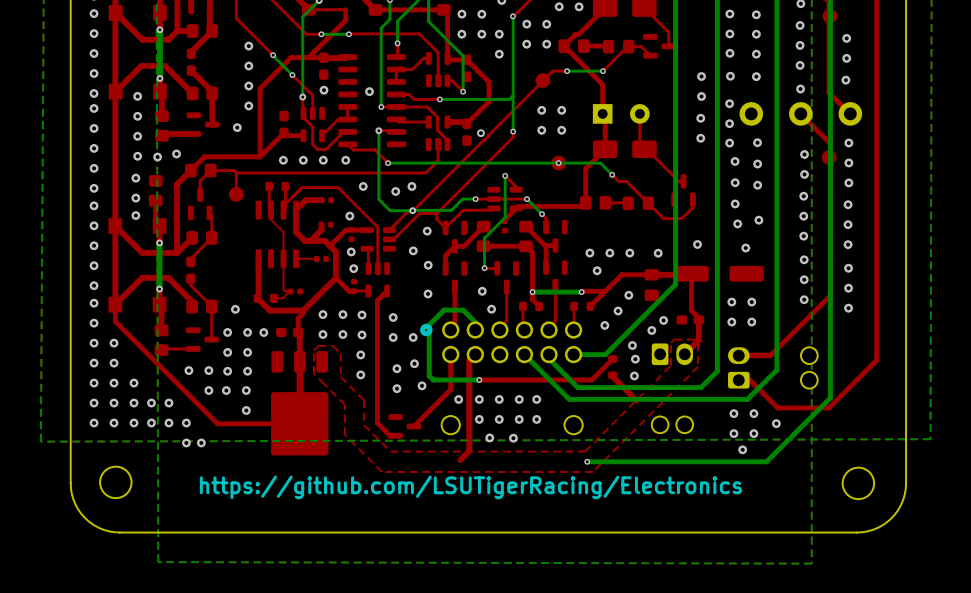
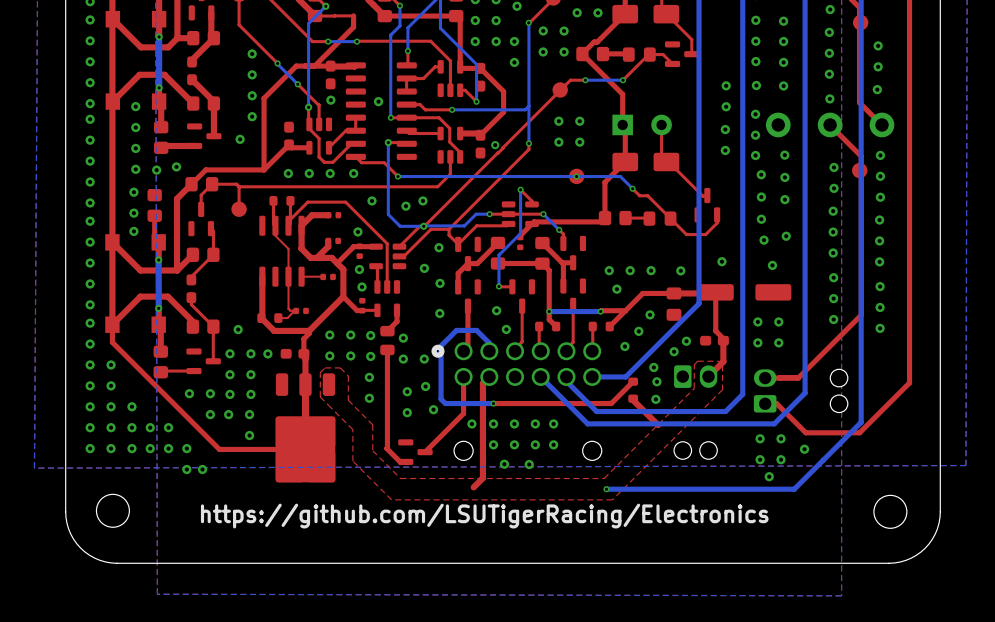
top track: (387, 290) (377, 300) (377, 422) -> (387, 349) (386, 448)
top track: none -> (396, 310) (396, 321) (387, 331)
part: none -> (387, 340)

